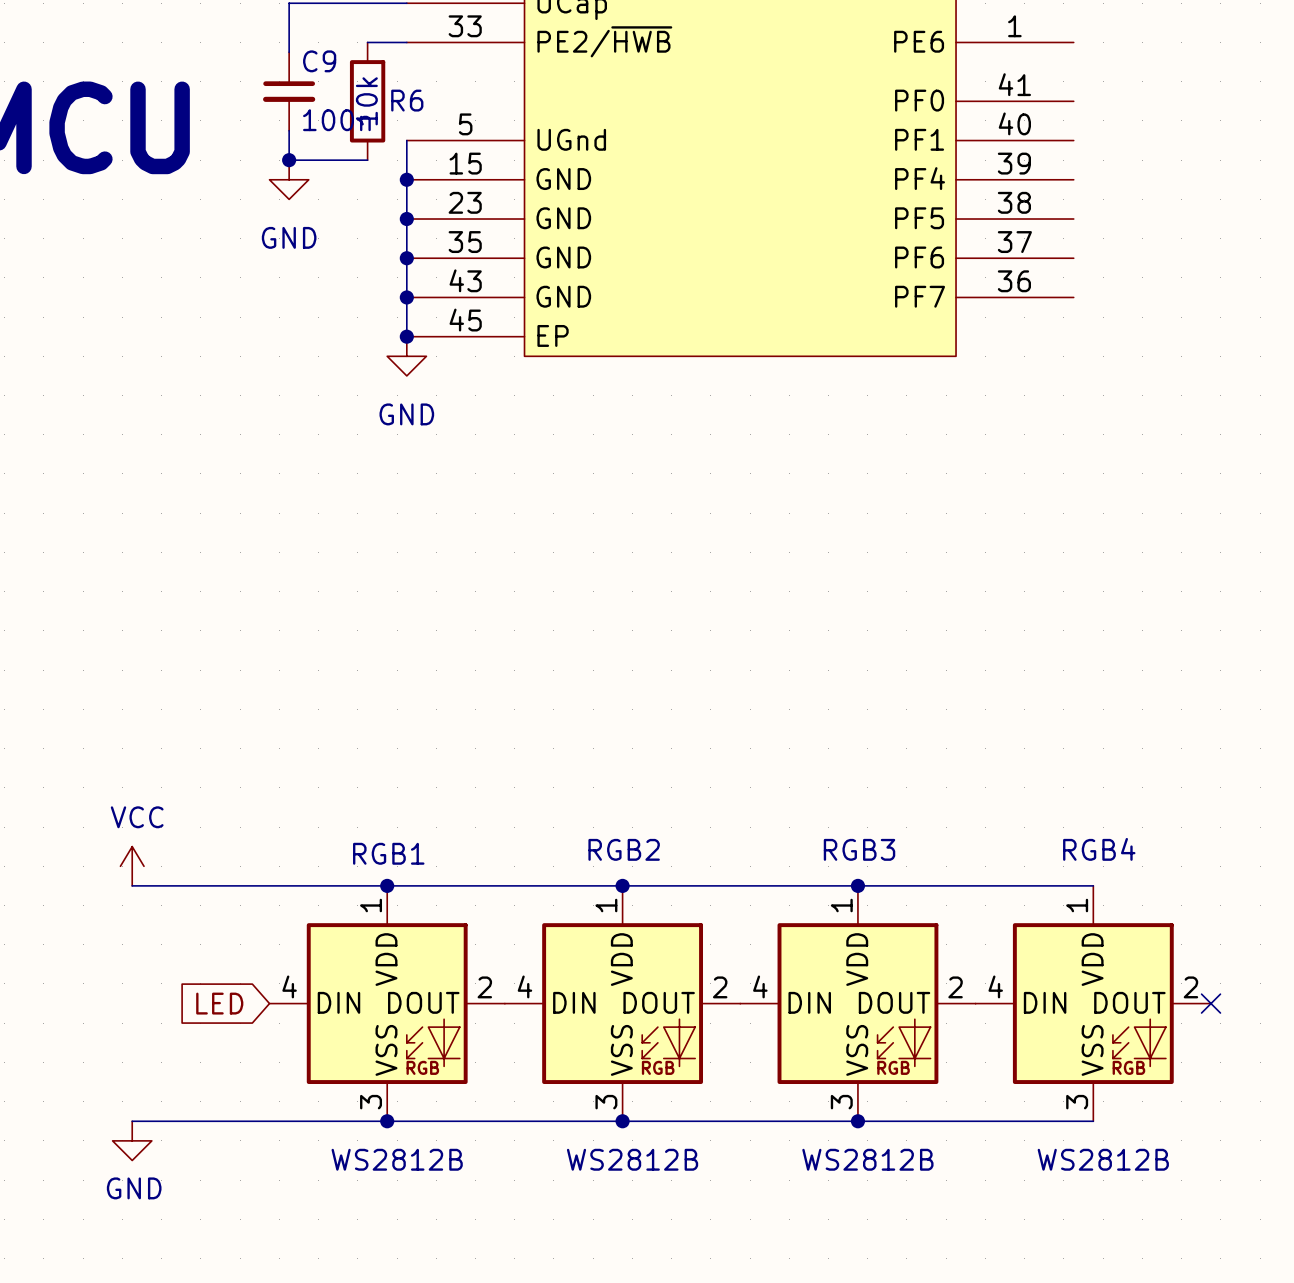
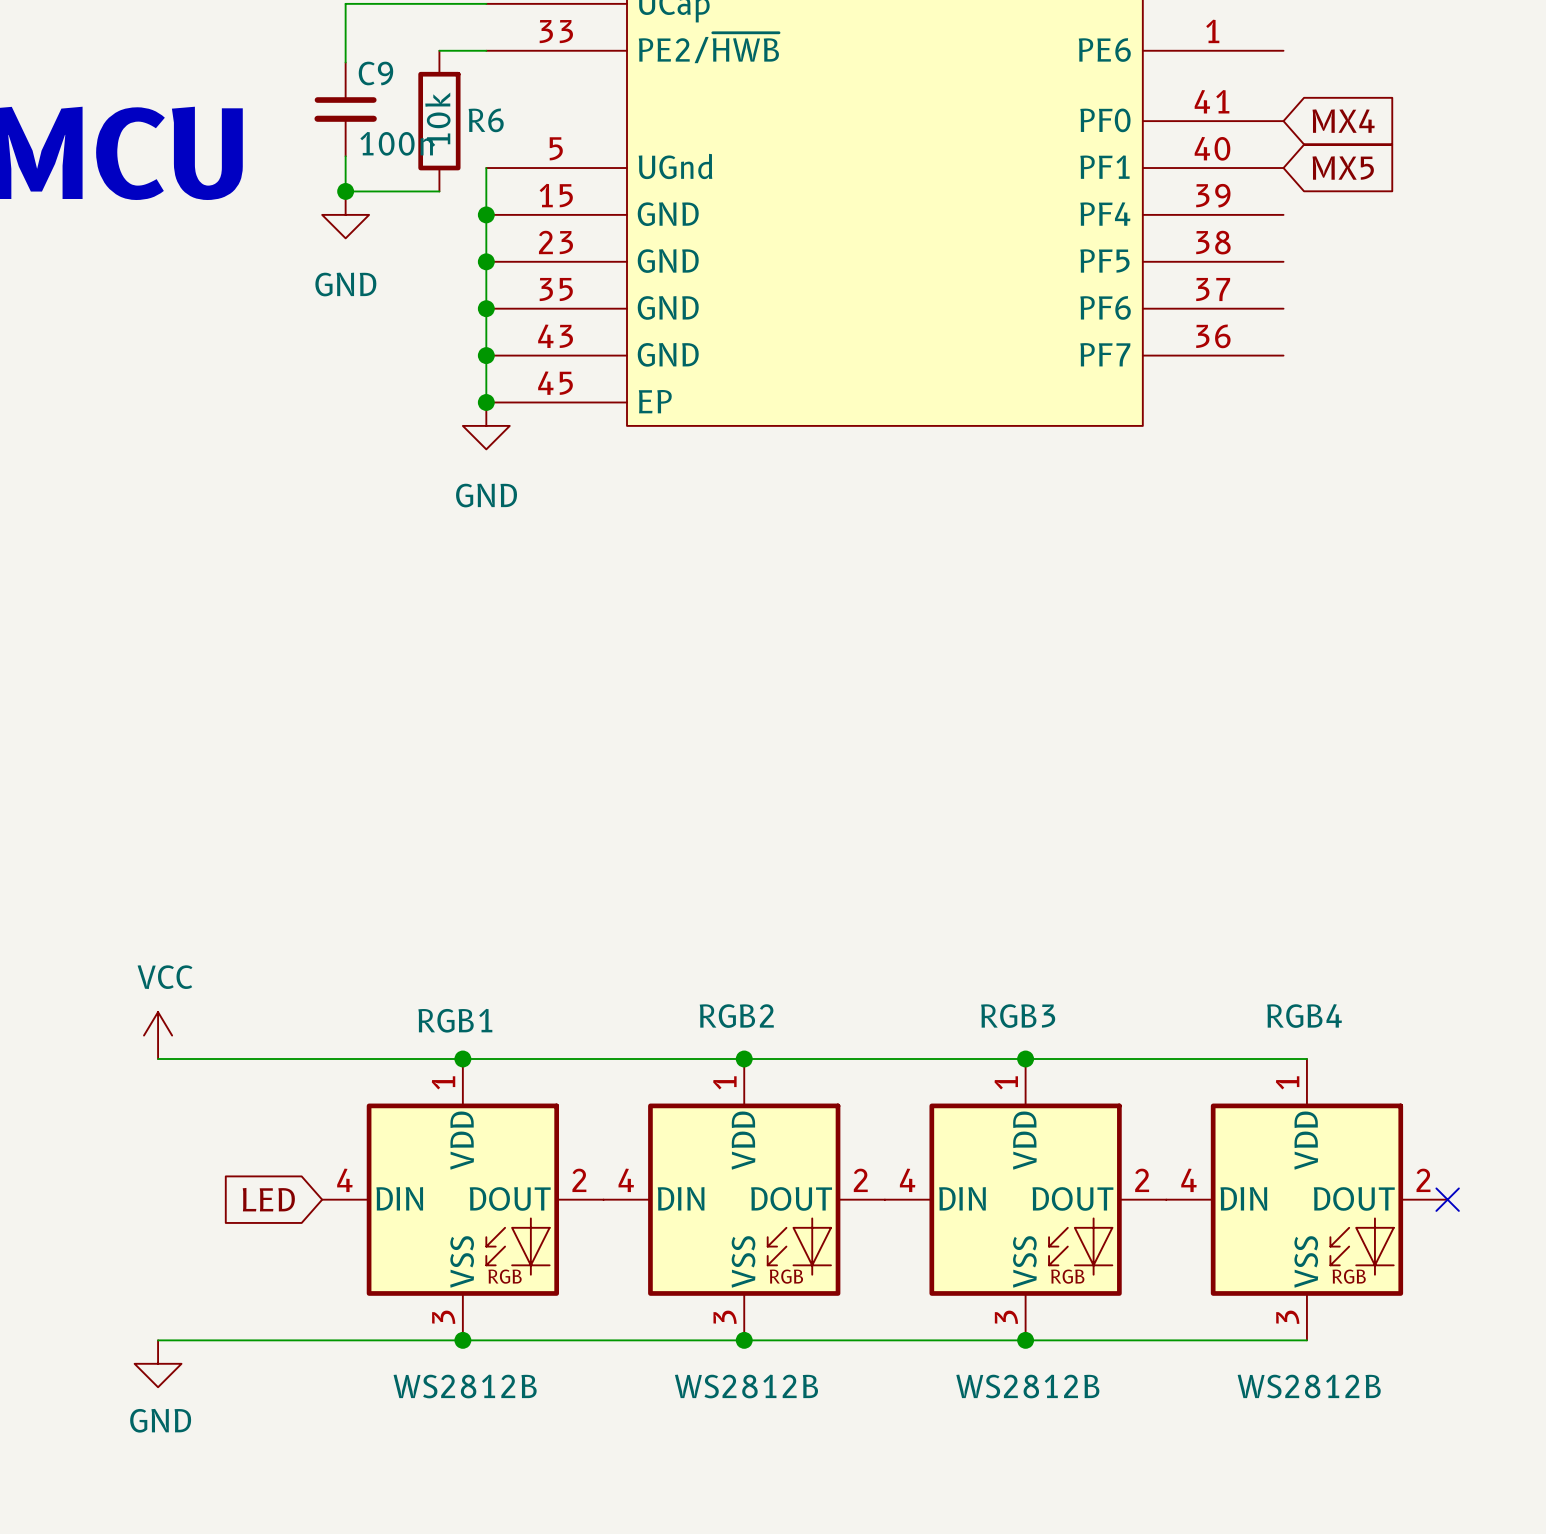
global label: none -> MX4 (1343, 121)
global label: none -> MX5 (1343, 168)

